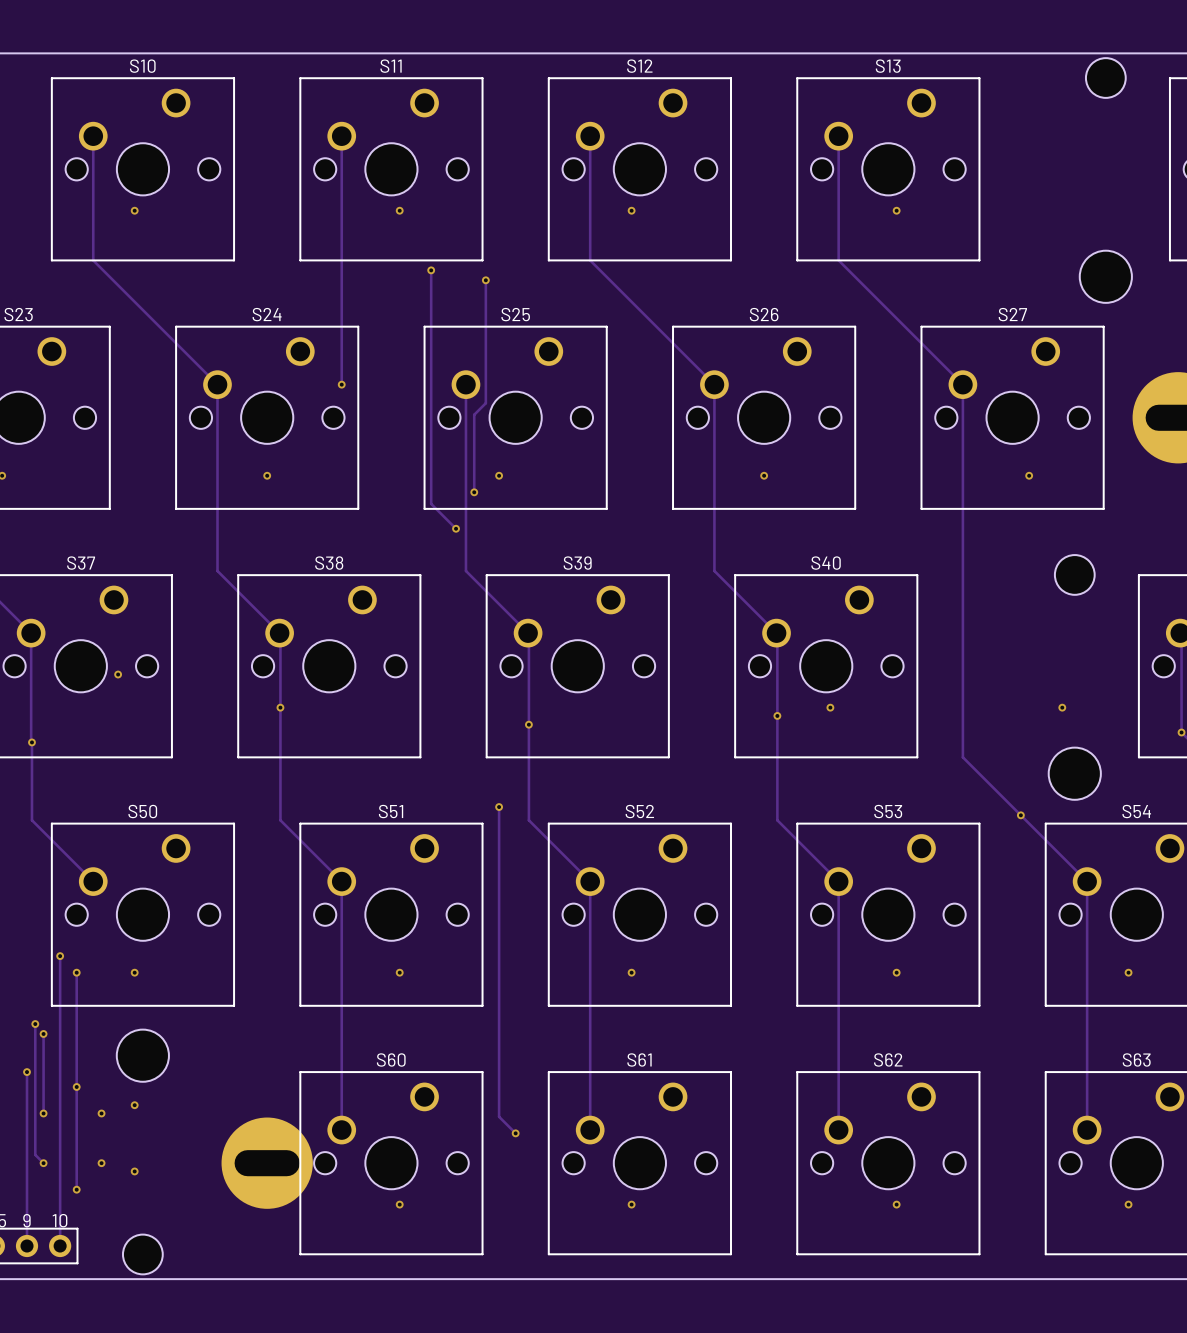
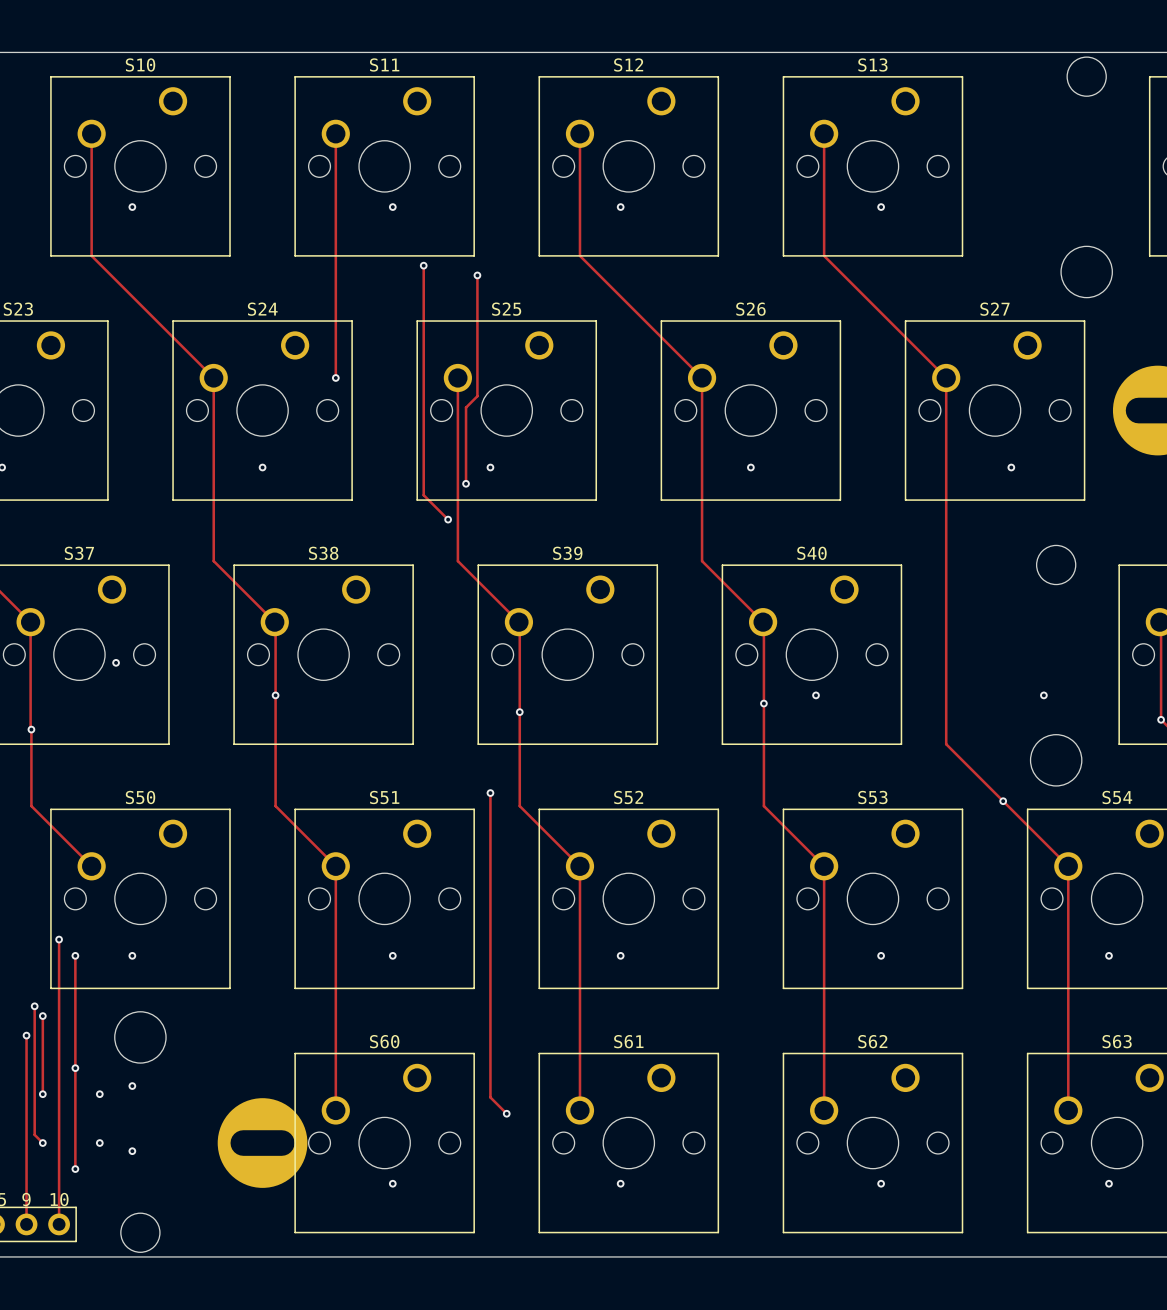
track: none -> (26, 1035) (26, 1053)
via: none -> (26, 1035)
via: (27, 1072) -> none

